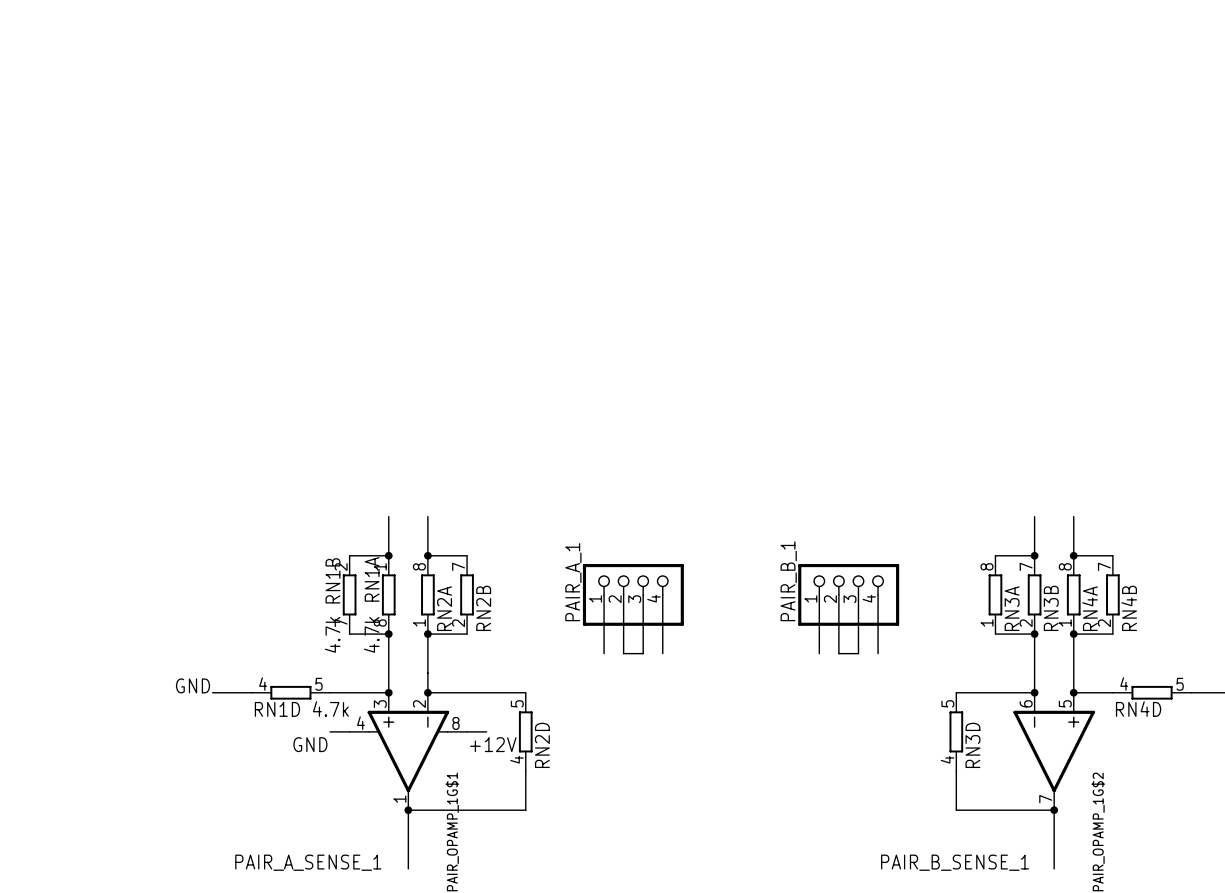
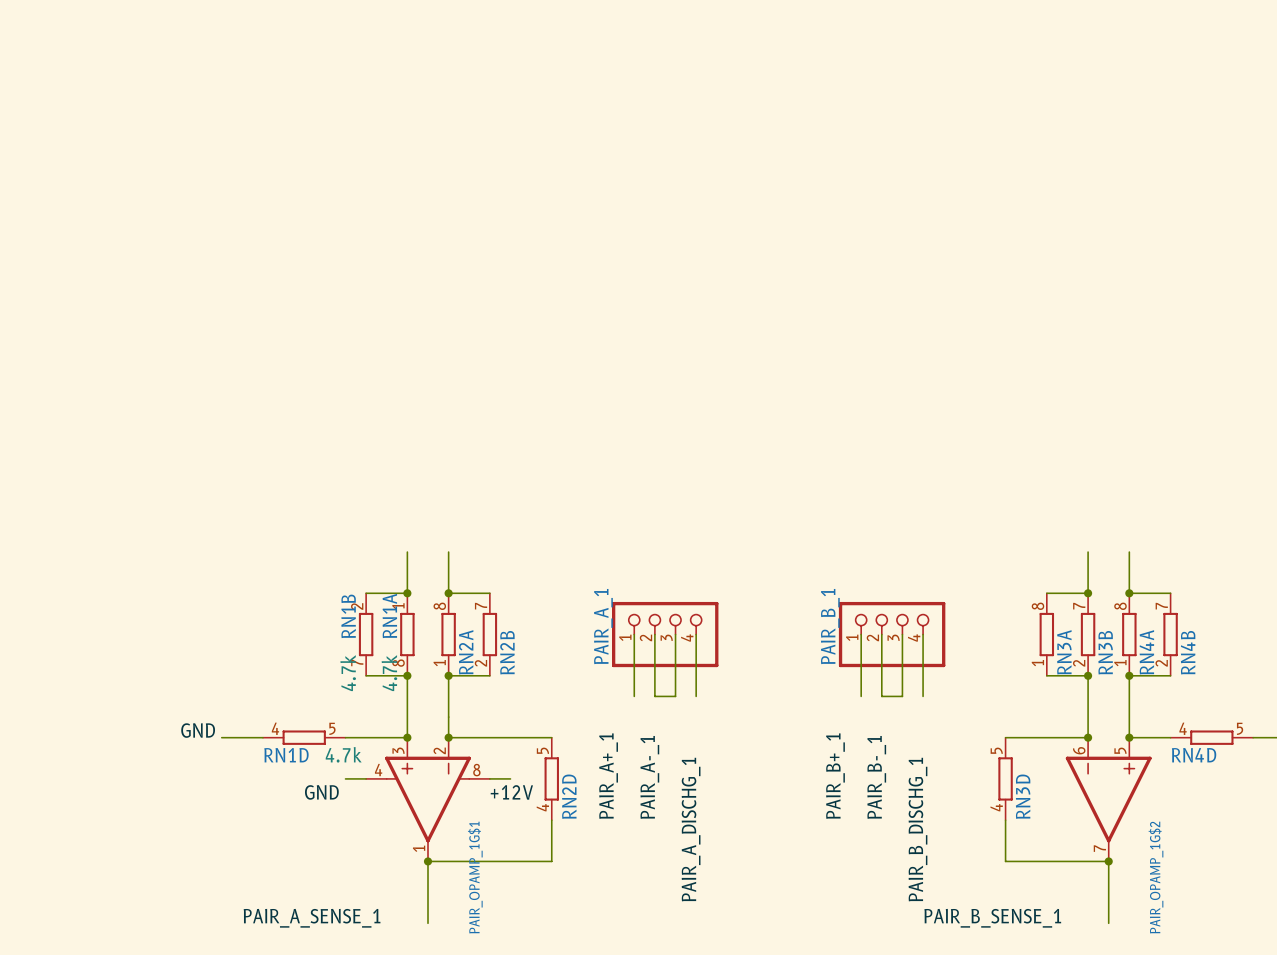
label: none -> PAIR_B+_1 (835, 776)
label: none -> PAIR_B-_1 (876, 777)
label: none -> PAIR_A+_1 (608, 776)
label: none -> PAIR_A-_1 (649, 777)
label: none -> PAIR_B_DISCHG_1 (918, 829)
label: none -> PAIR_A_DISCHG_1 (691, 829)

